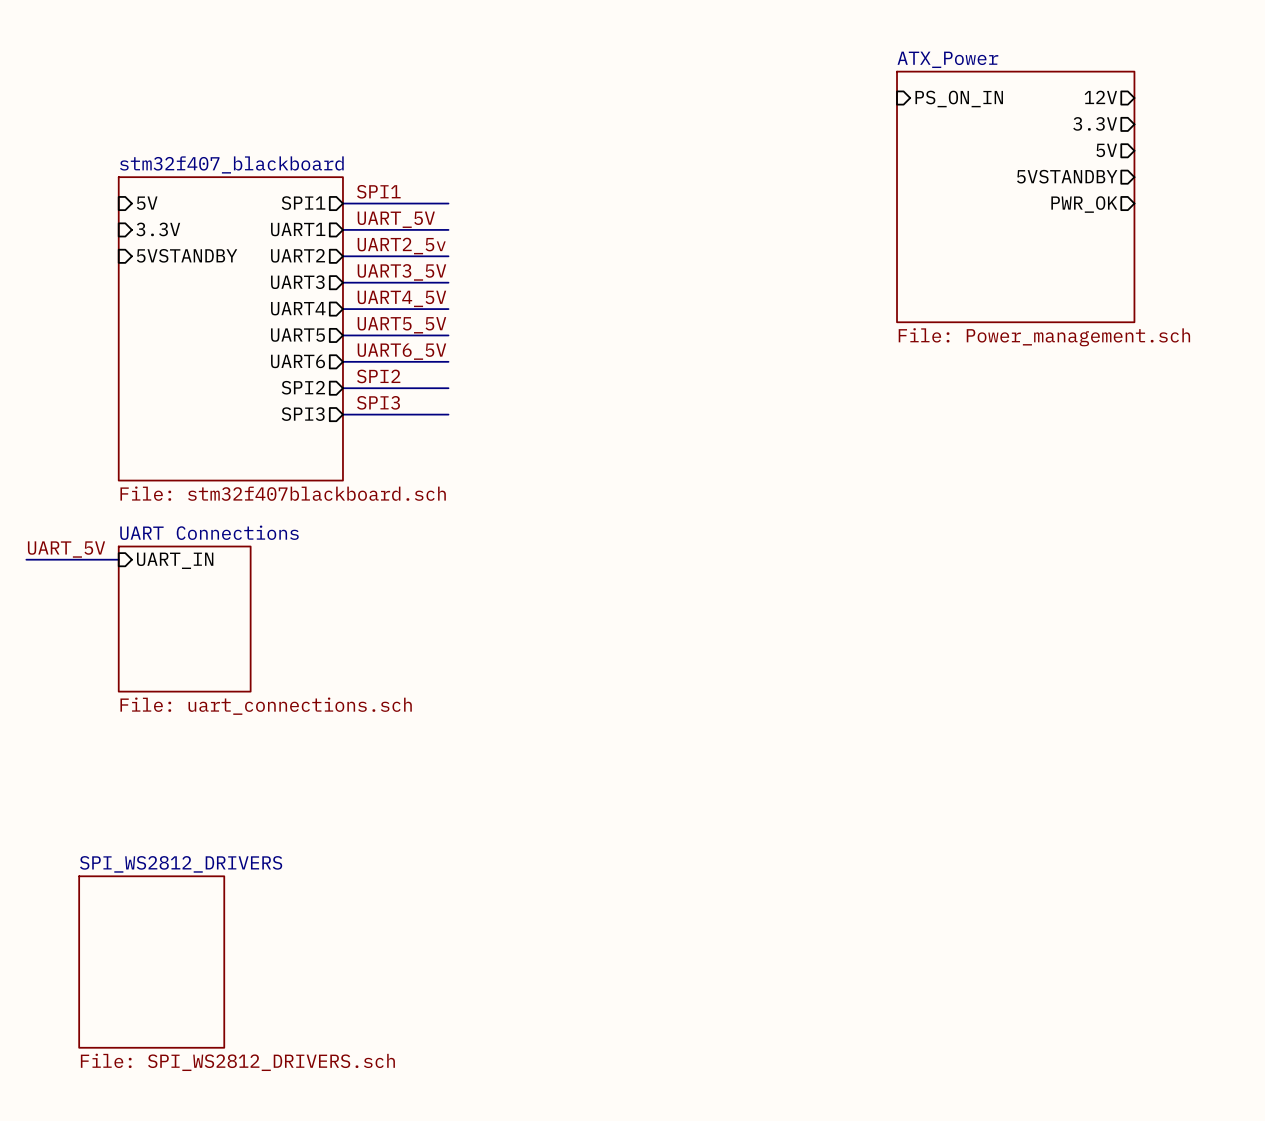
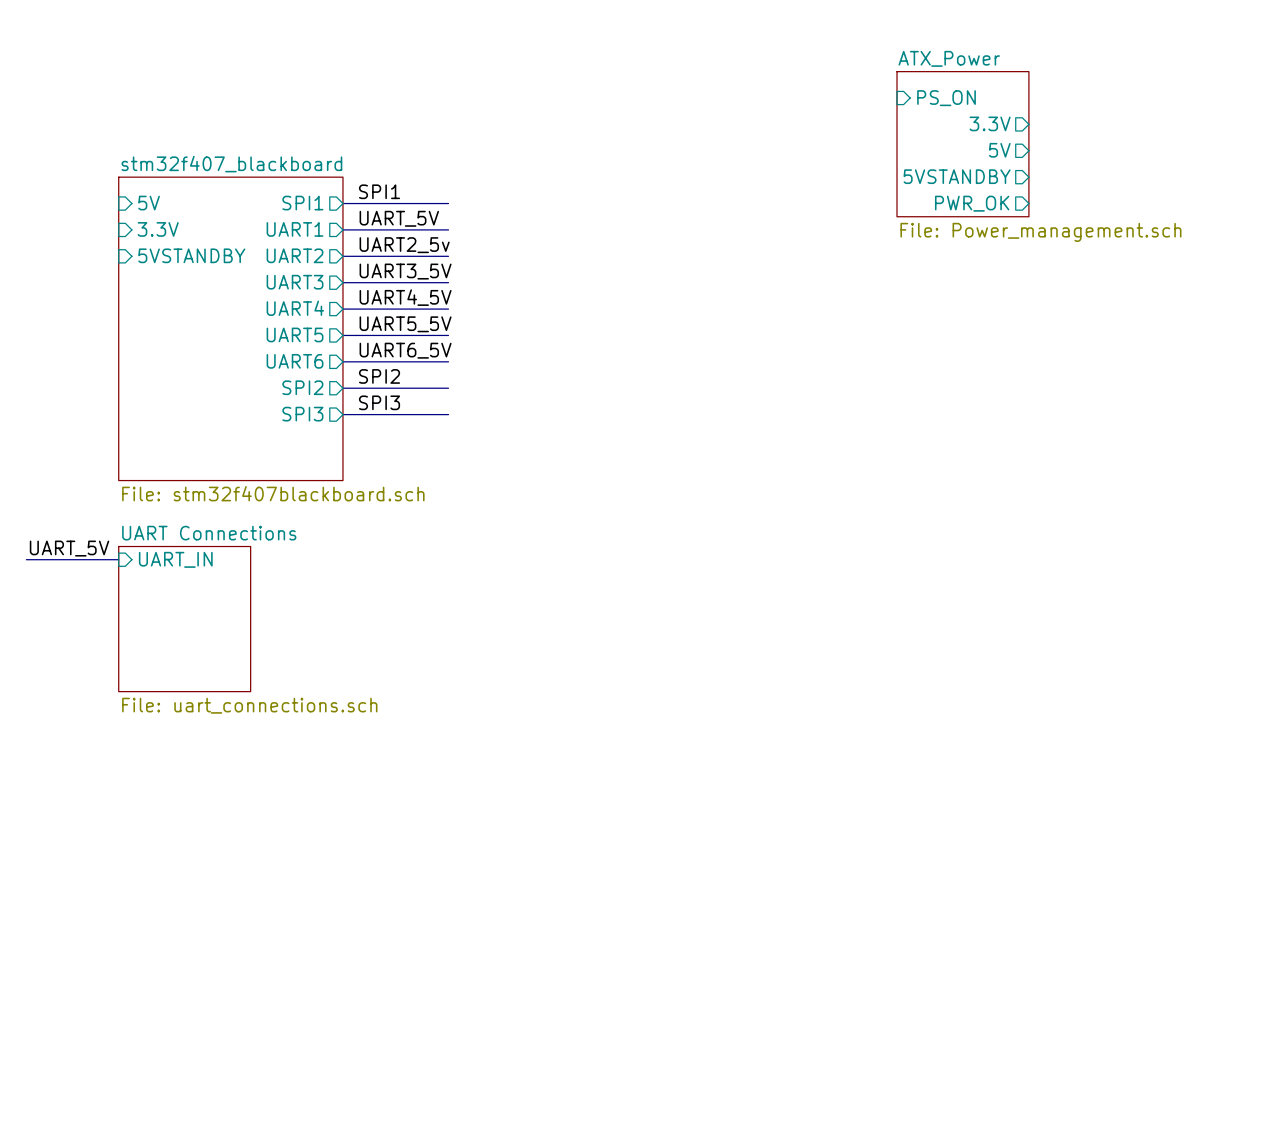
sheet pin: 12V (1100, 97) -> none
sheet pin: PS_ON_IN (959, 99) -> PS_ON (946, 98)
sheet pin position: 3.3V (1095, 123) -> 3.3V (990, 123)
sheet ATX_Power: none -> File: Power_management.sch (962, 144)
sheet pin position: 5V (1106, 150) -> 5V (999, 150)
sheet pin position: 5VSTANDBY (1067, 176) -> 5VSTANDBY (957, 176)
sheet ATX_Power: File: Power_management.sch (1015, 196) -> none
sheet pin position: PWR_OK (1084, 204) -> PWR_OK (972, 203)
sheet SPI_WS2812_DRIVERS: File: SPI_WS2812_DRIVERS.sch (151, 962) -> none

